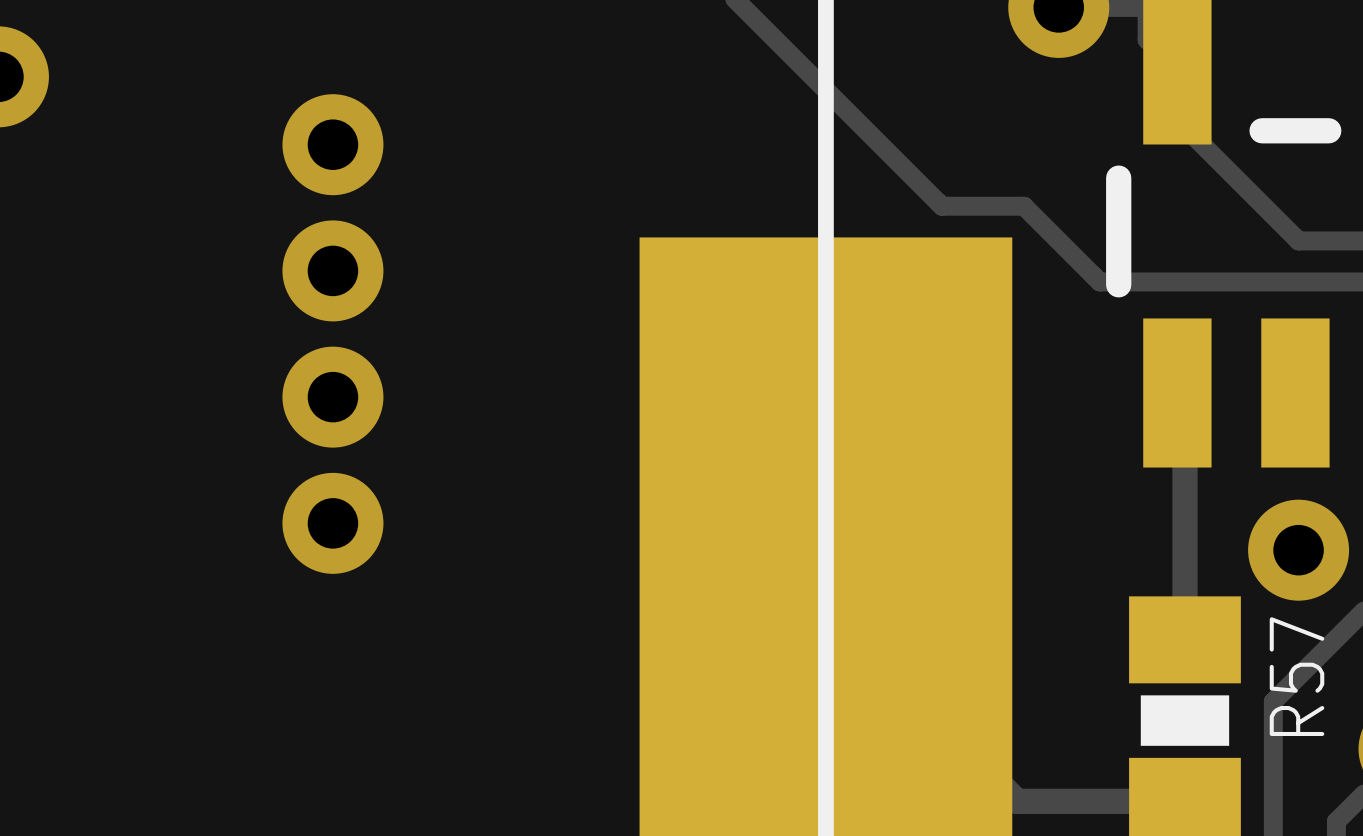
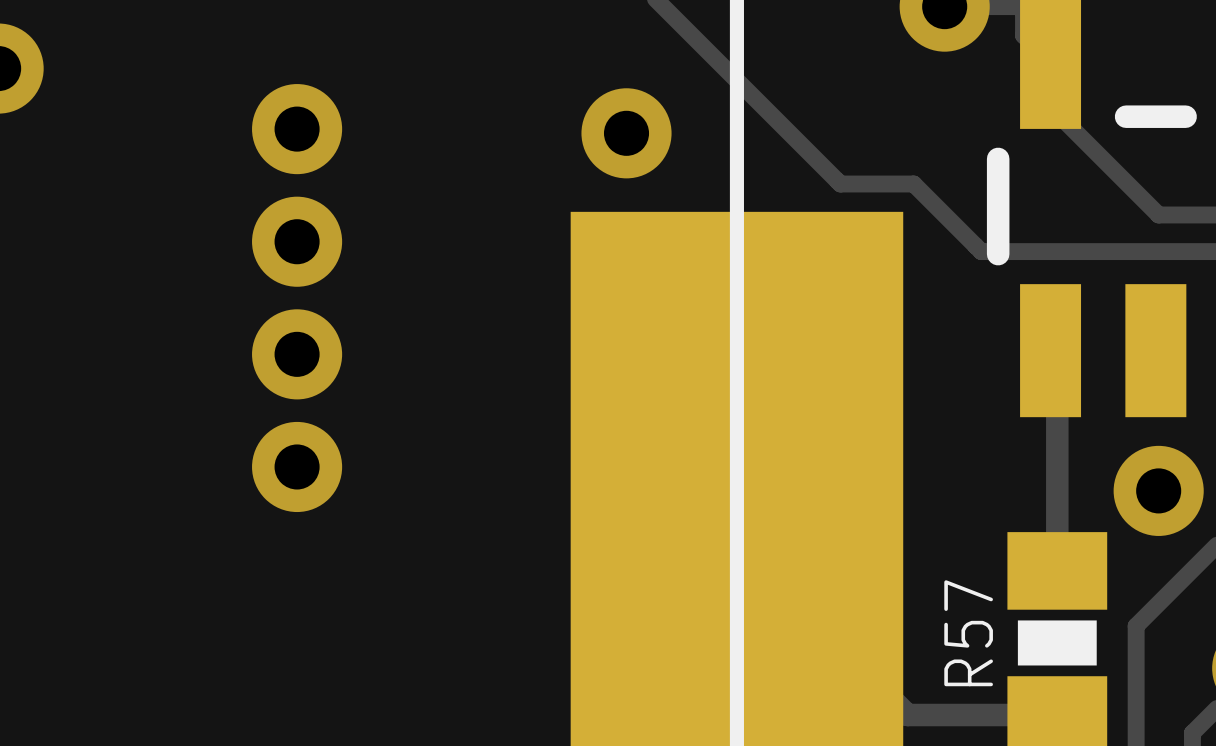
via: none -> (626, 133)
R57 name position: R57 (1297, 676) -> R57 (968, 633)

